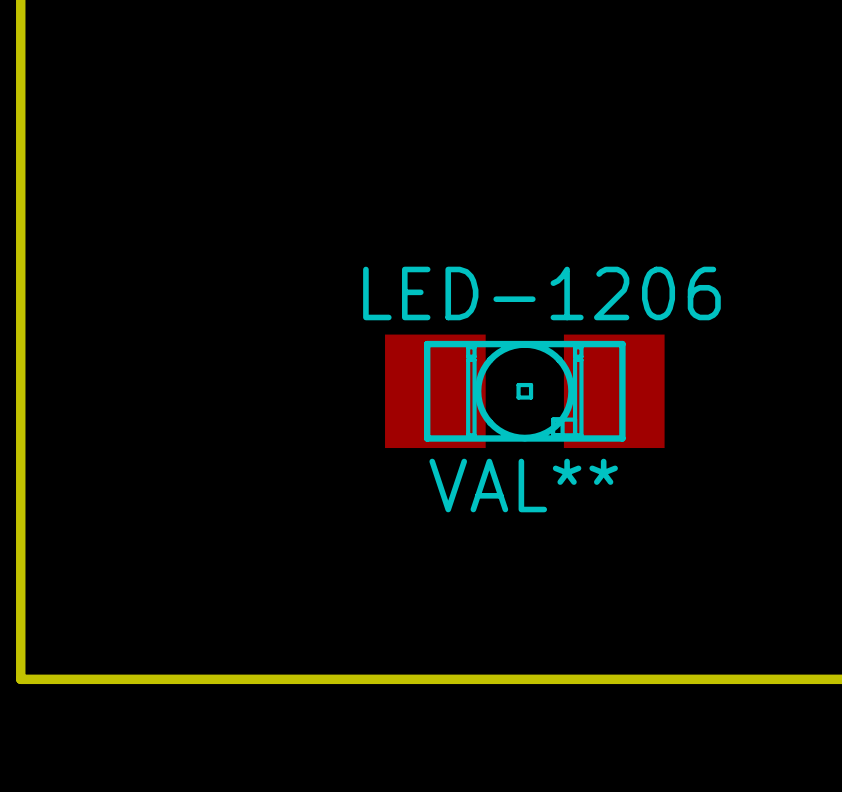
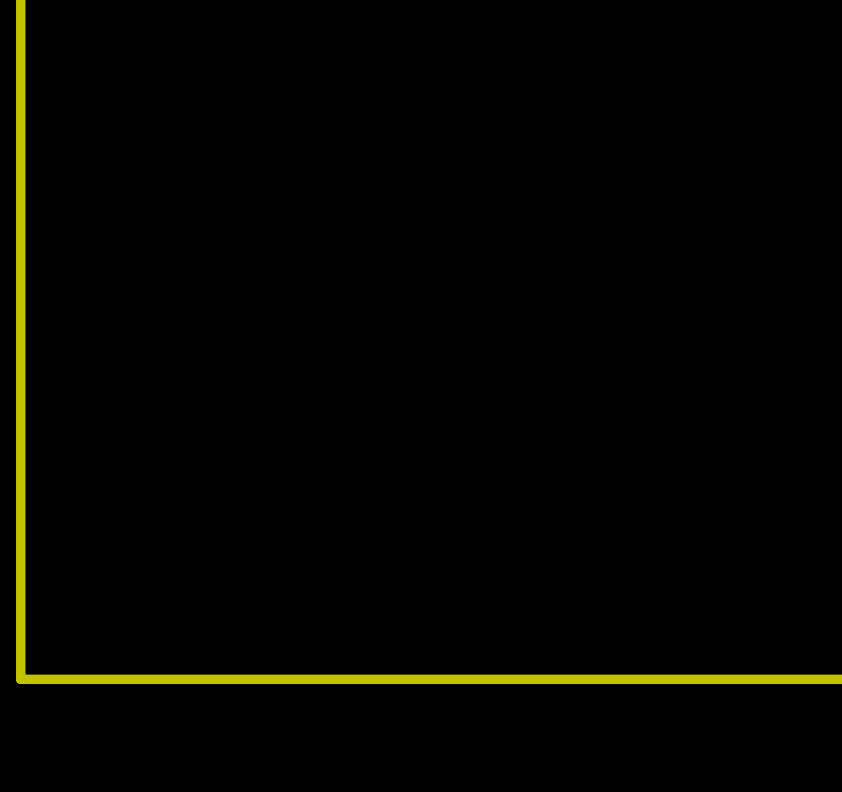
LED-1206: VAL** (524, 391) -> none

